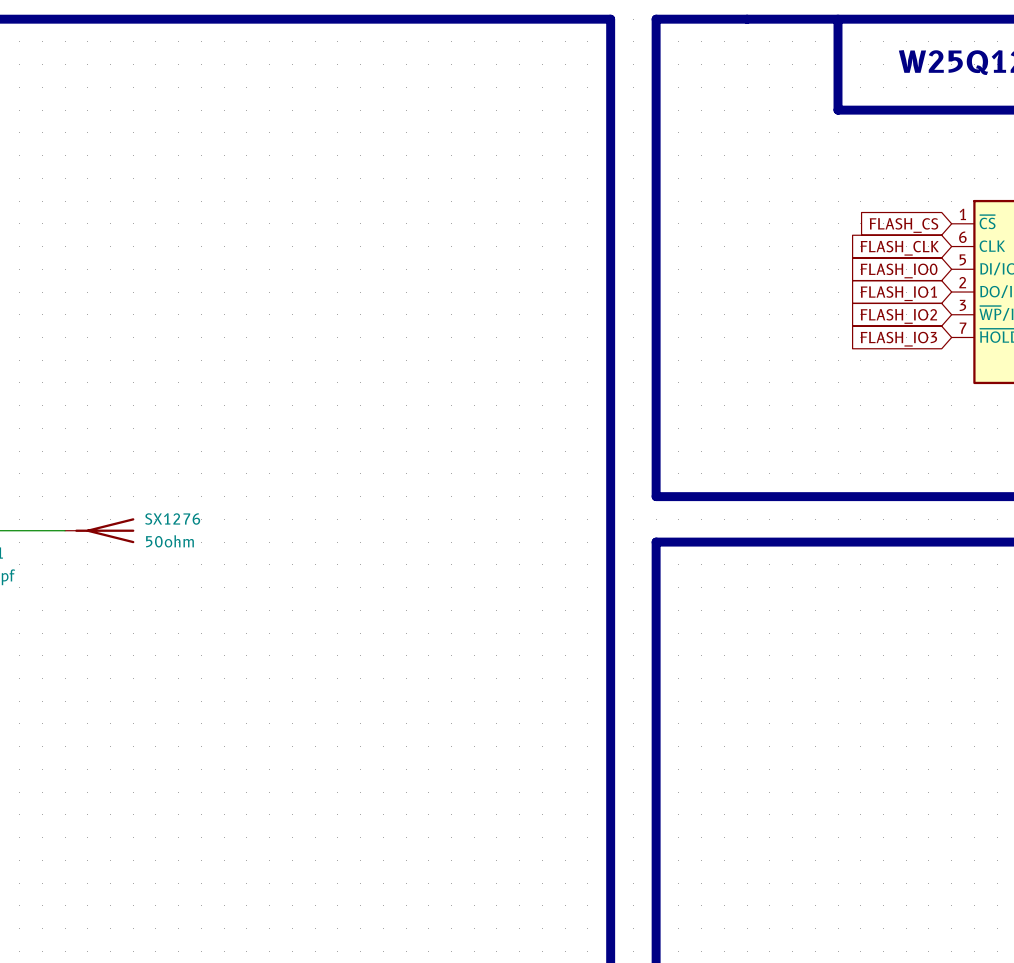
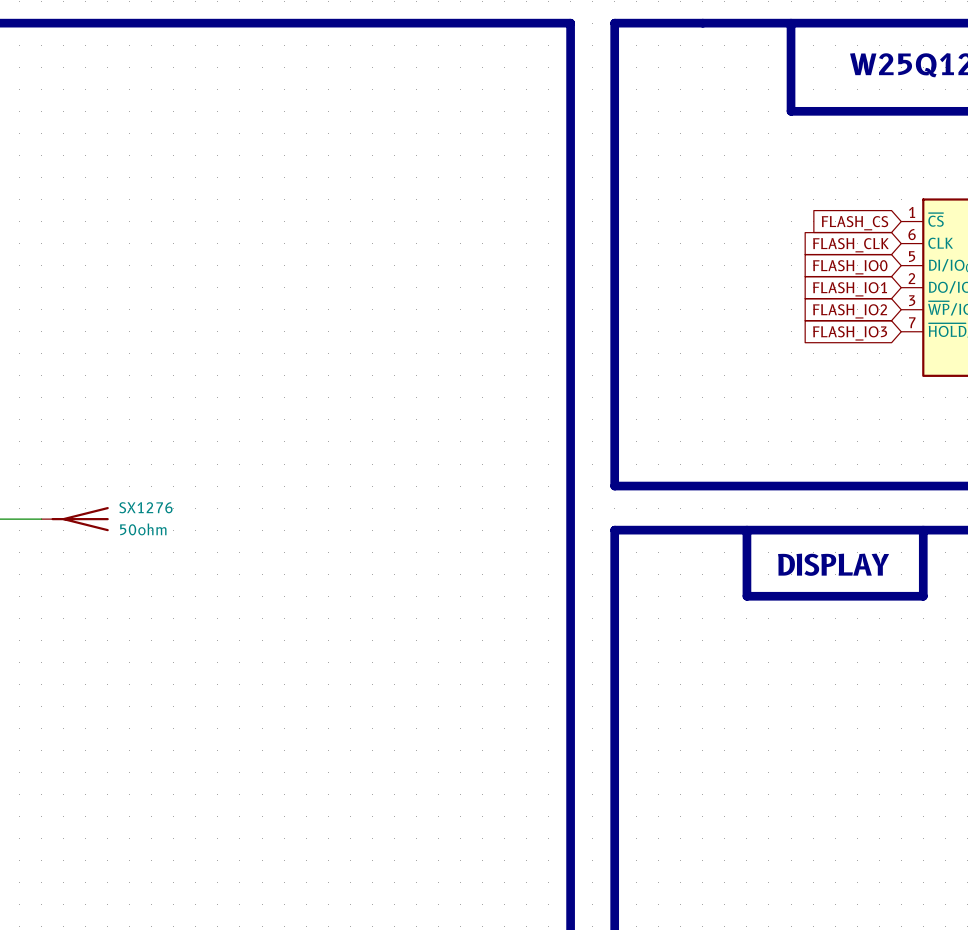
line: none -> (746, 530) (746, 596) (923, 596) (923, 530)
text: none -> DISPLAY (833, 564)

